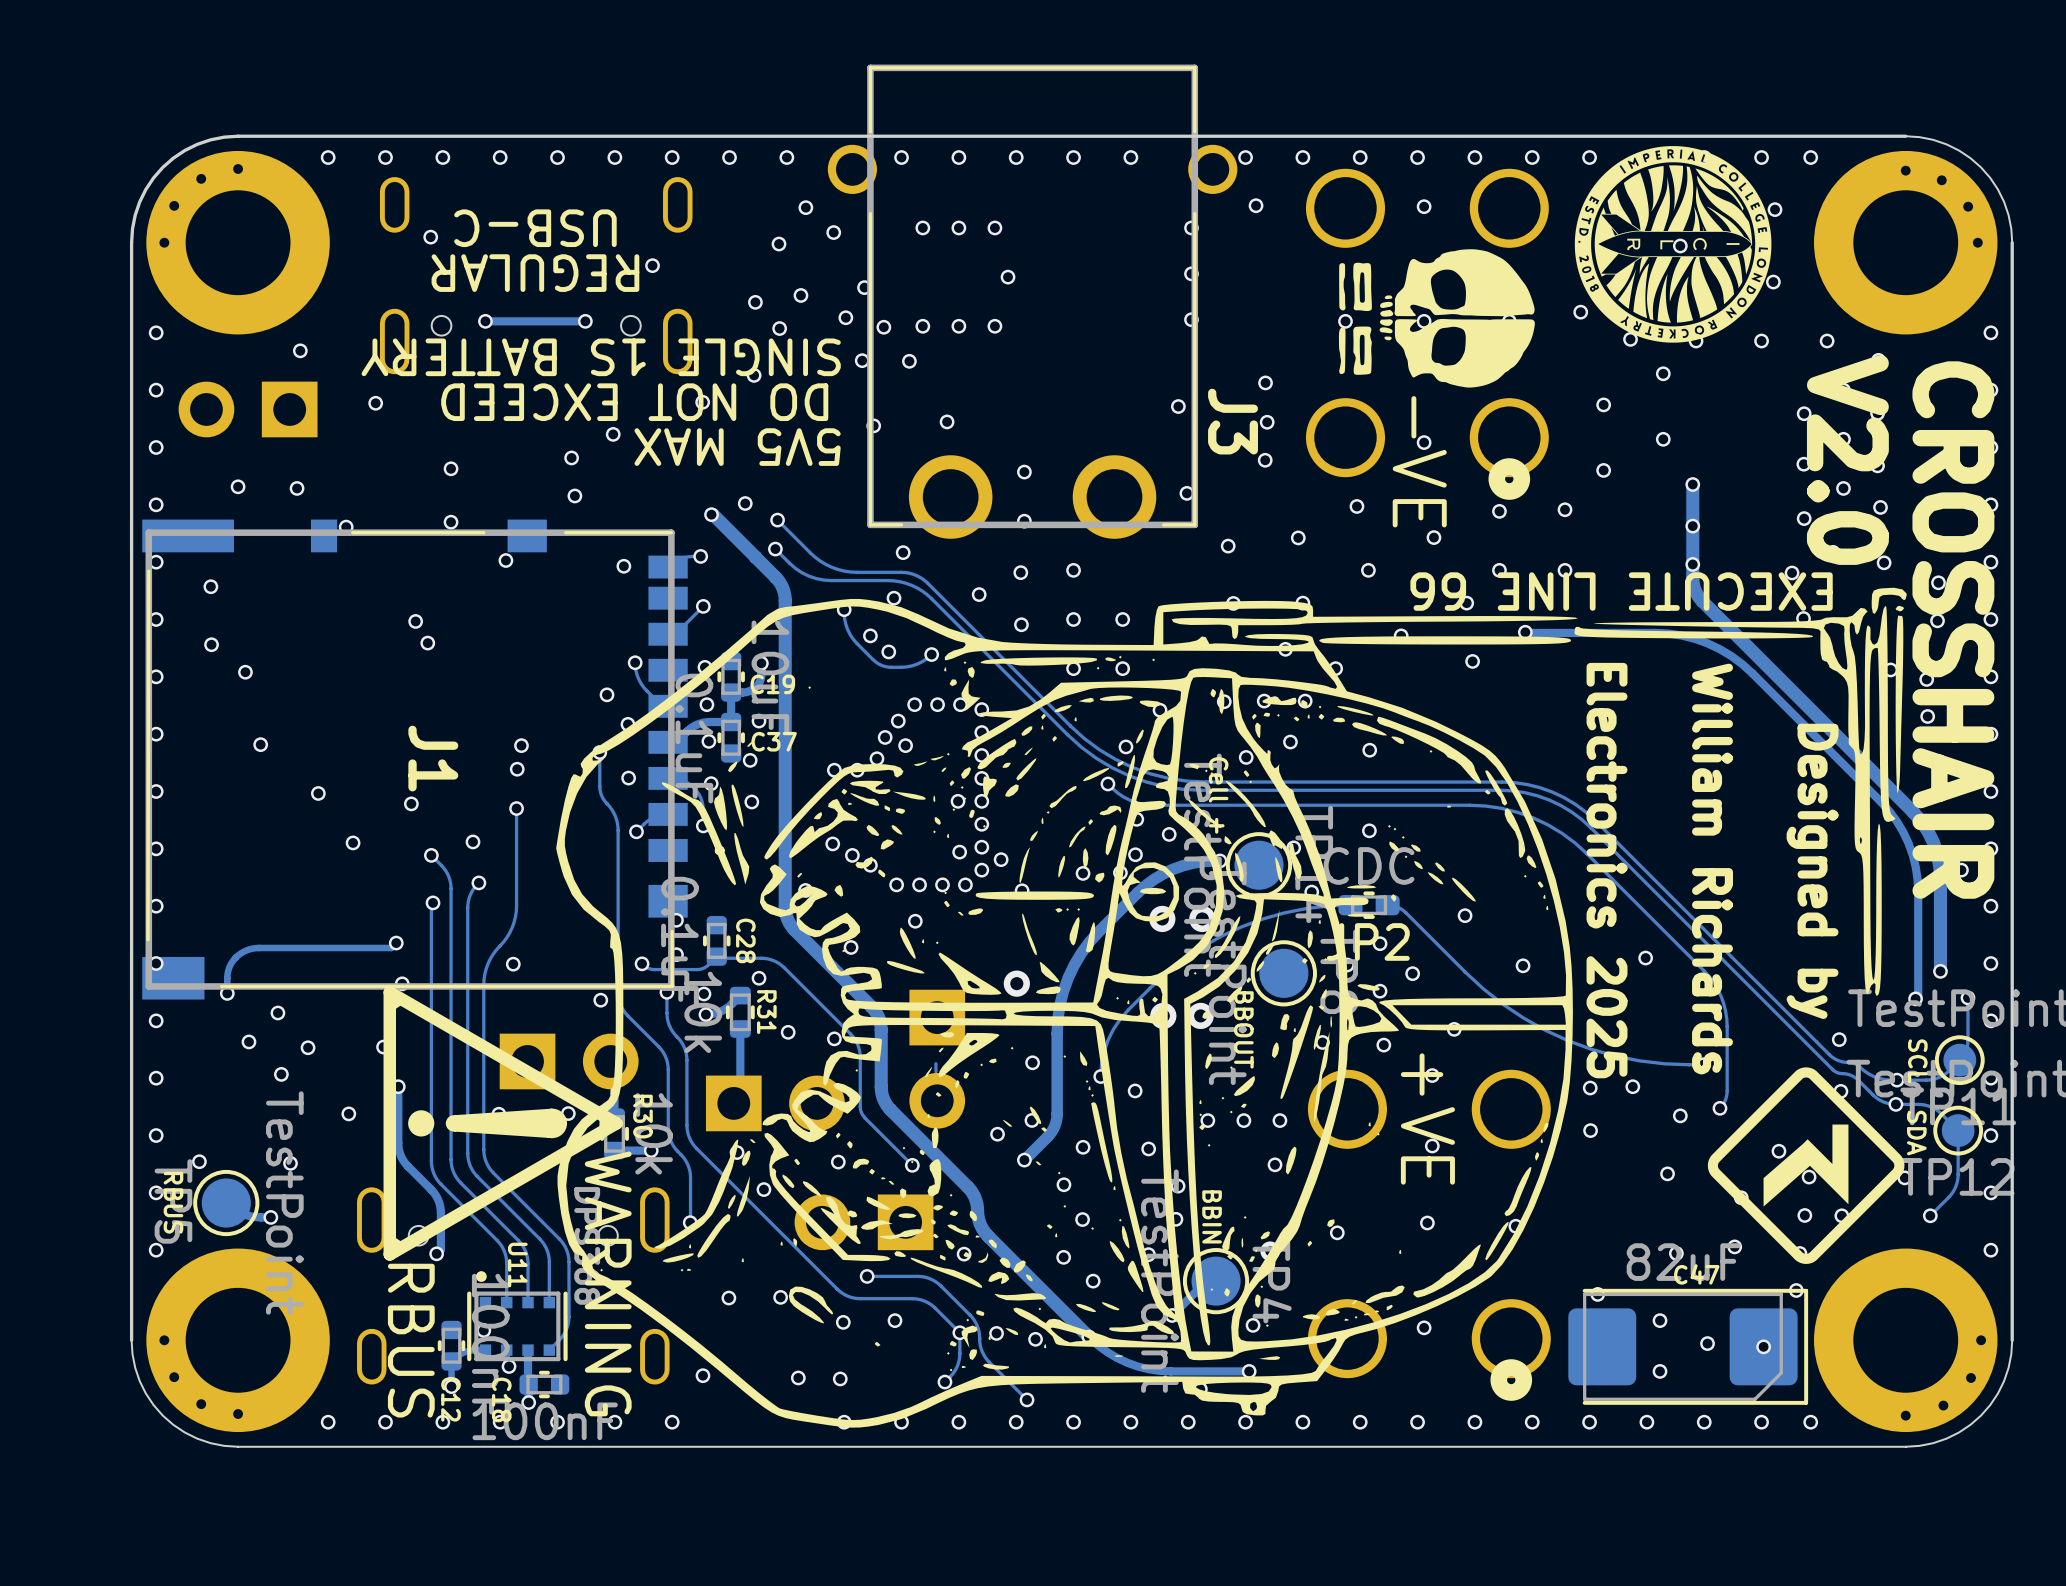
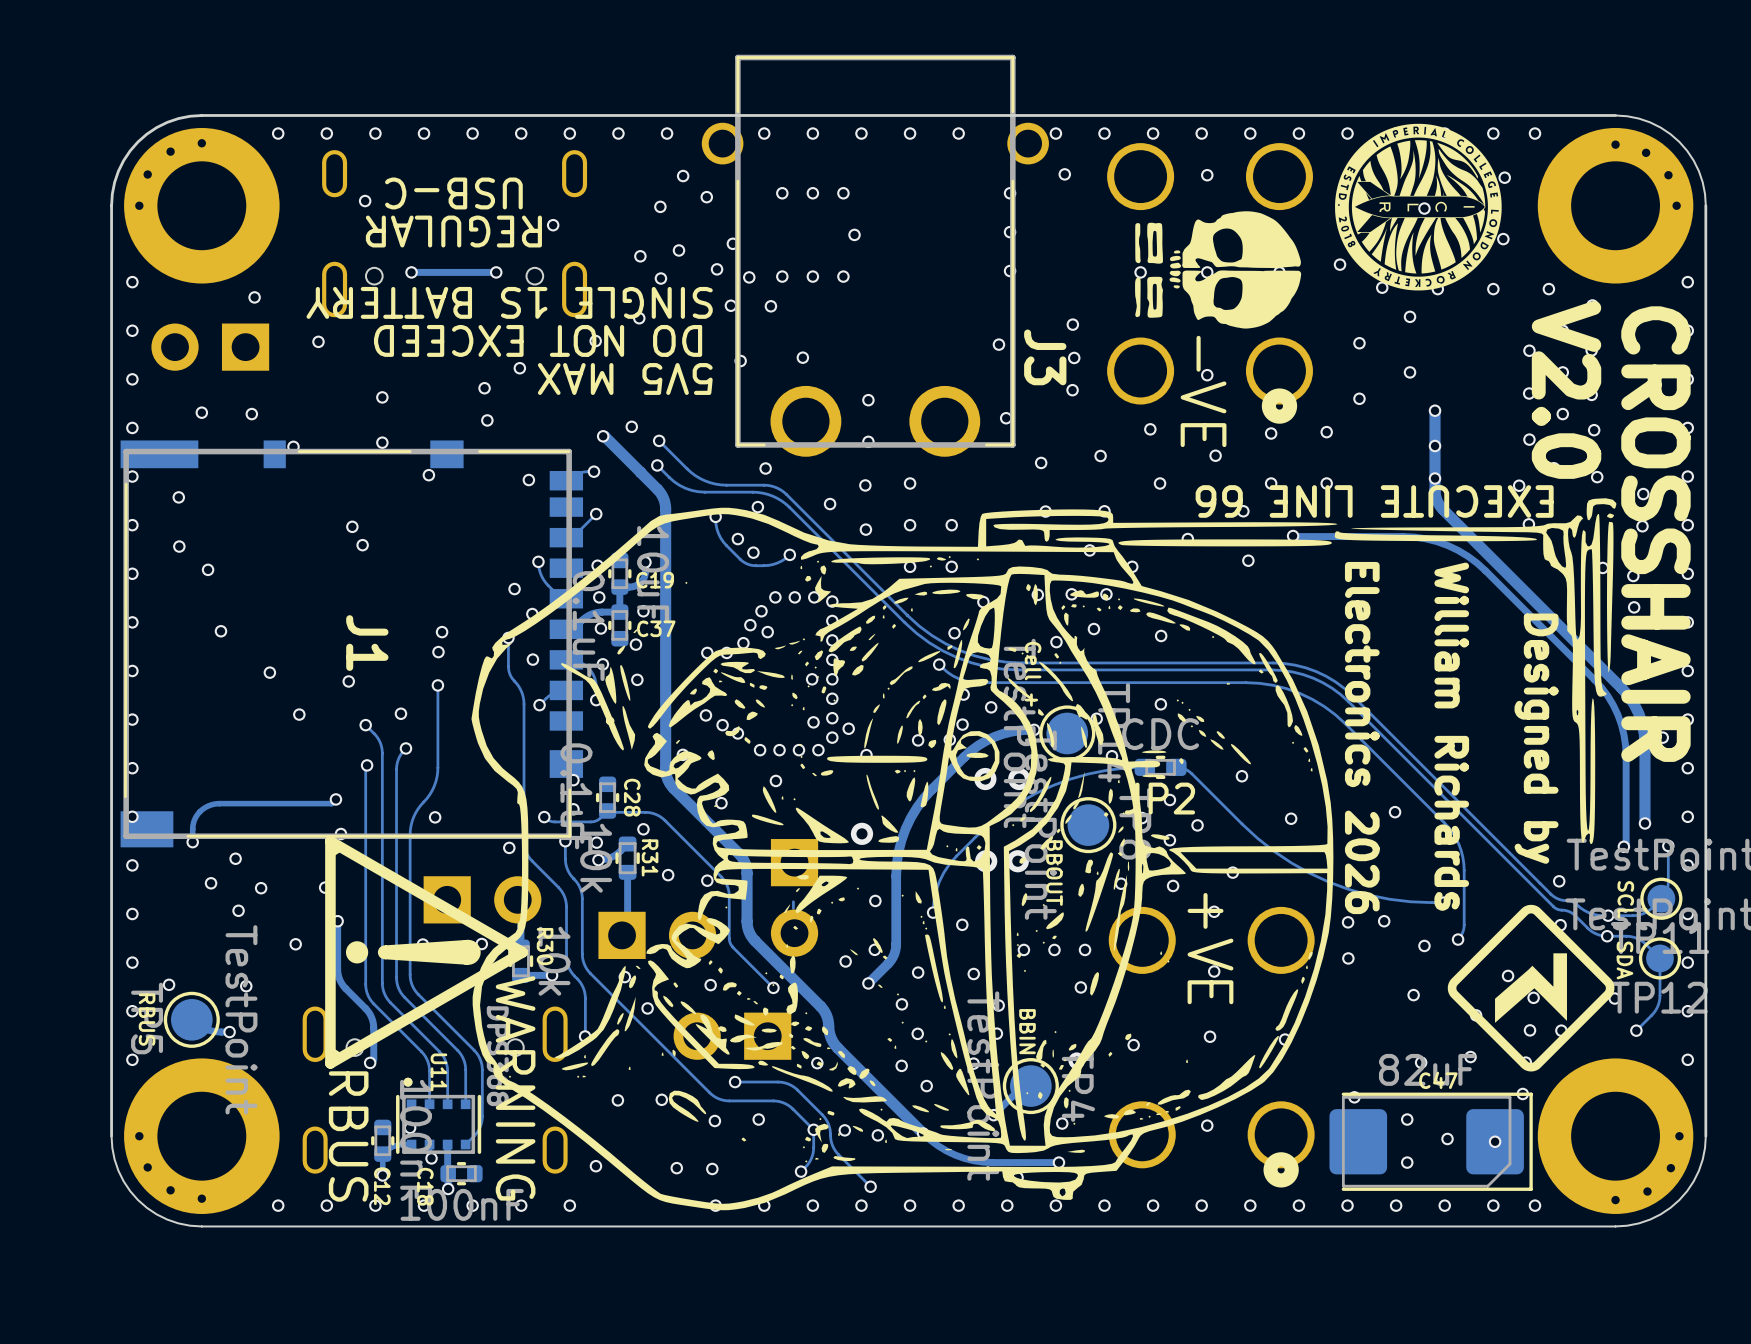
text: Electronics 2025 (1607, 870) -> Electronics 2026 (1362, 738)

